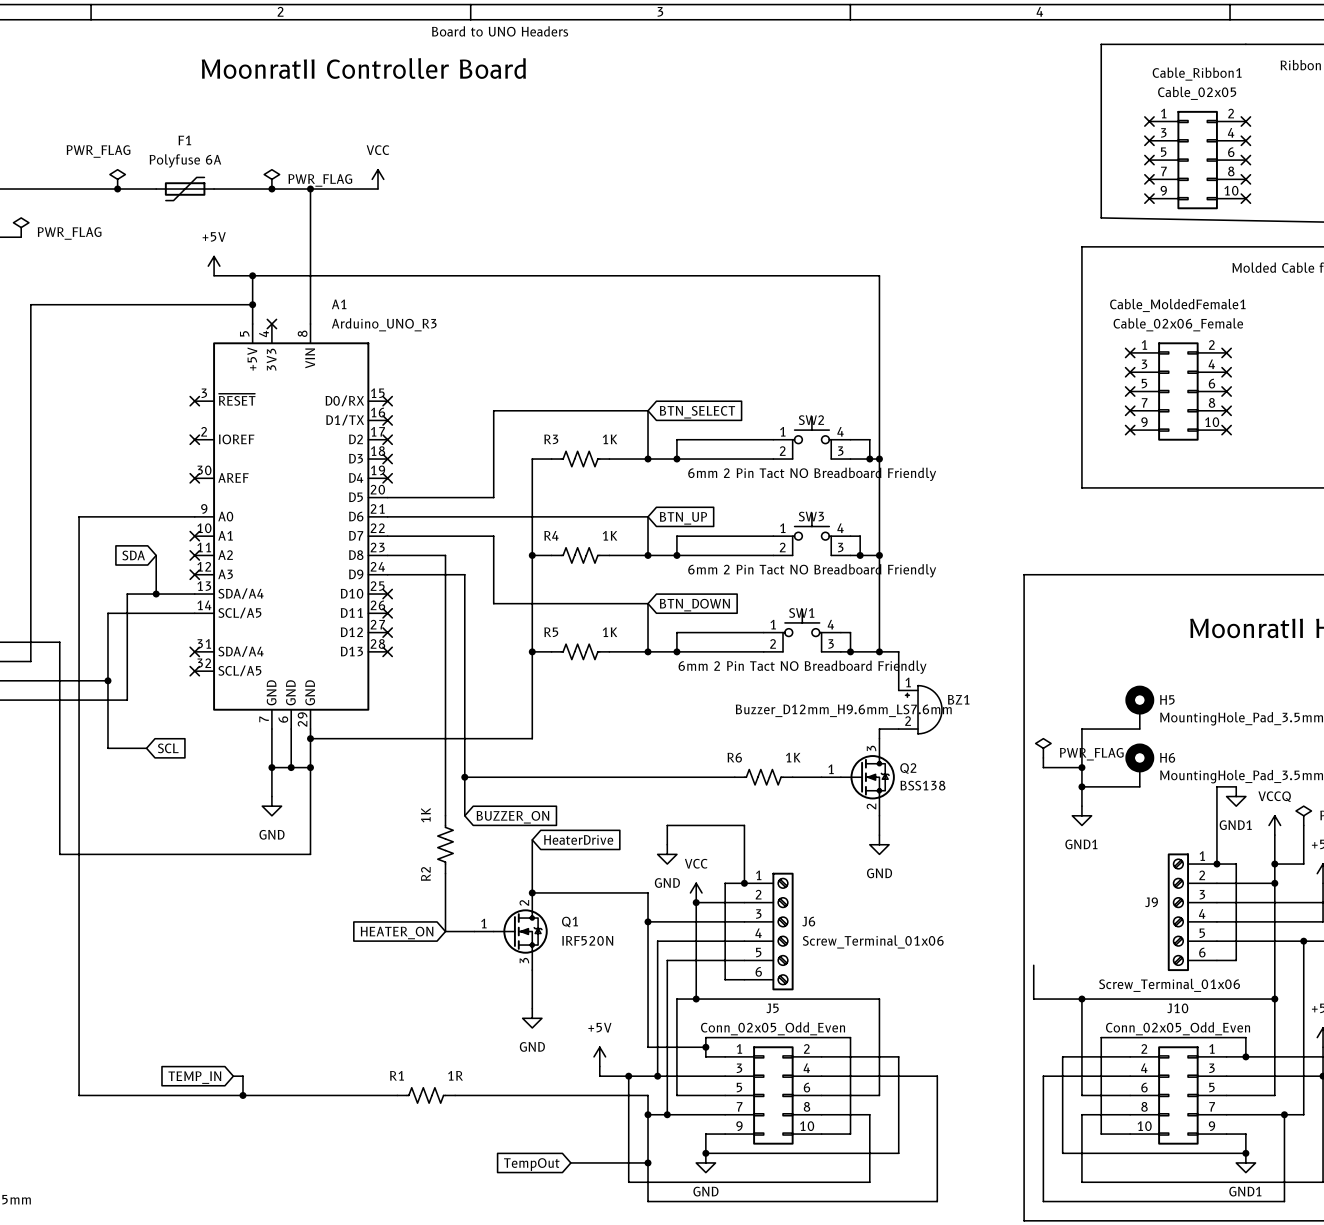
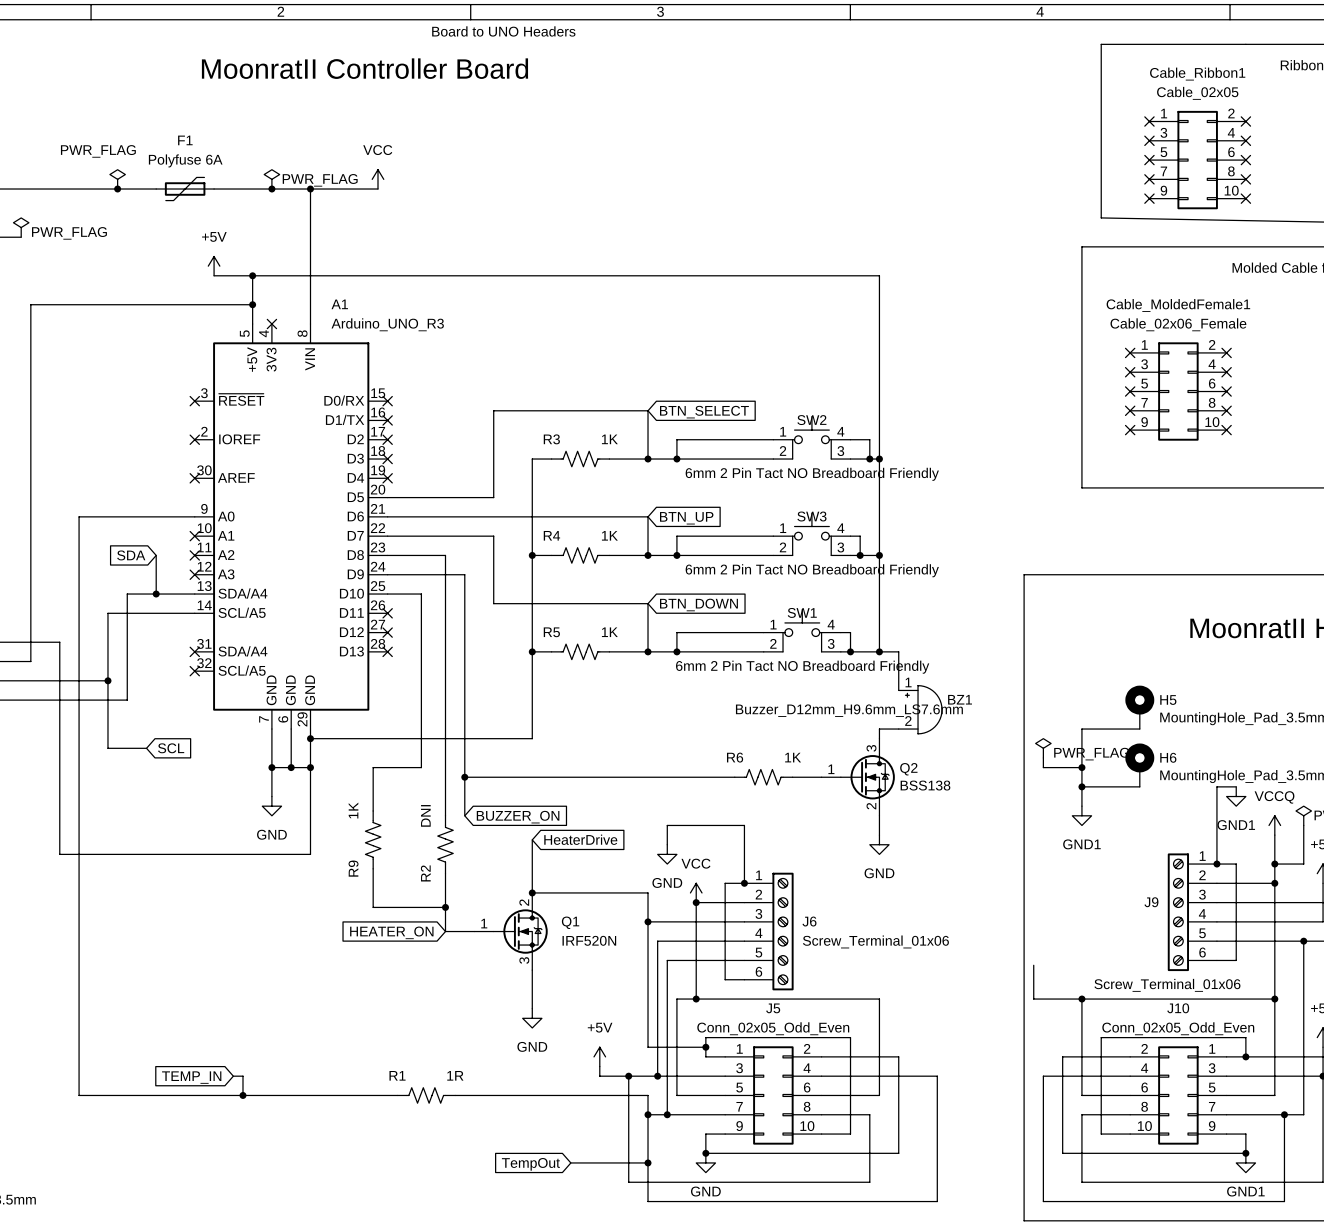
wire: none -> (387, 594) (421, 594) (421, 767) (373, 767) (373, 810)
no-connect mark: (387, 594) -> none
R2 value: 1K (425, 815) -> DNI (425, 815)
R9: none -> 1K (373, 839)
wire: none -> (373, 868) (373, 907) (445, 907)
junction: none -> (445, 907)

